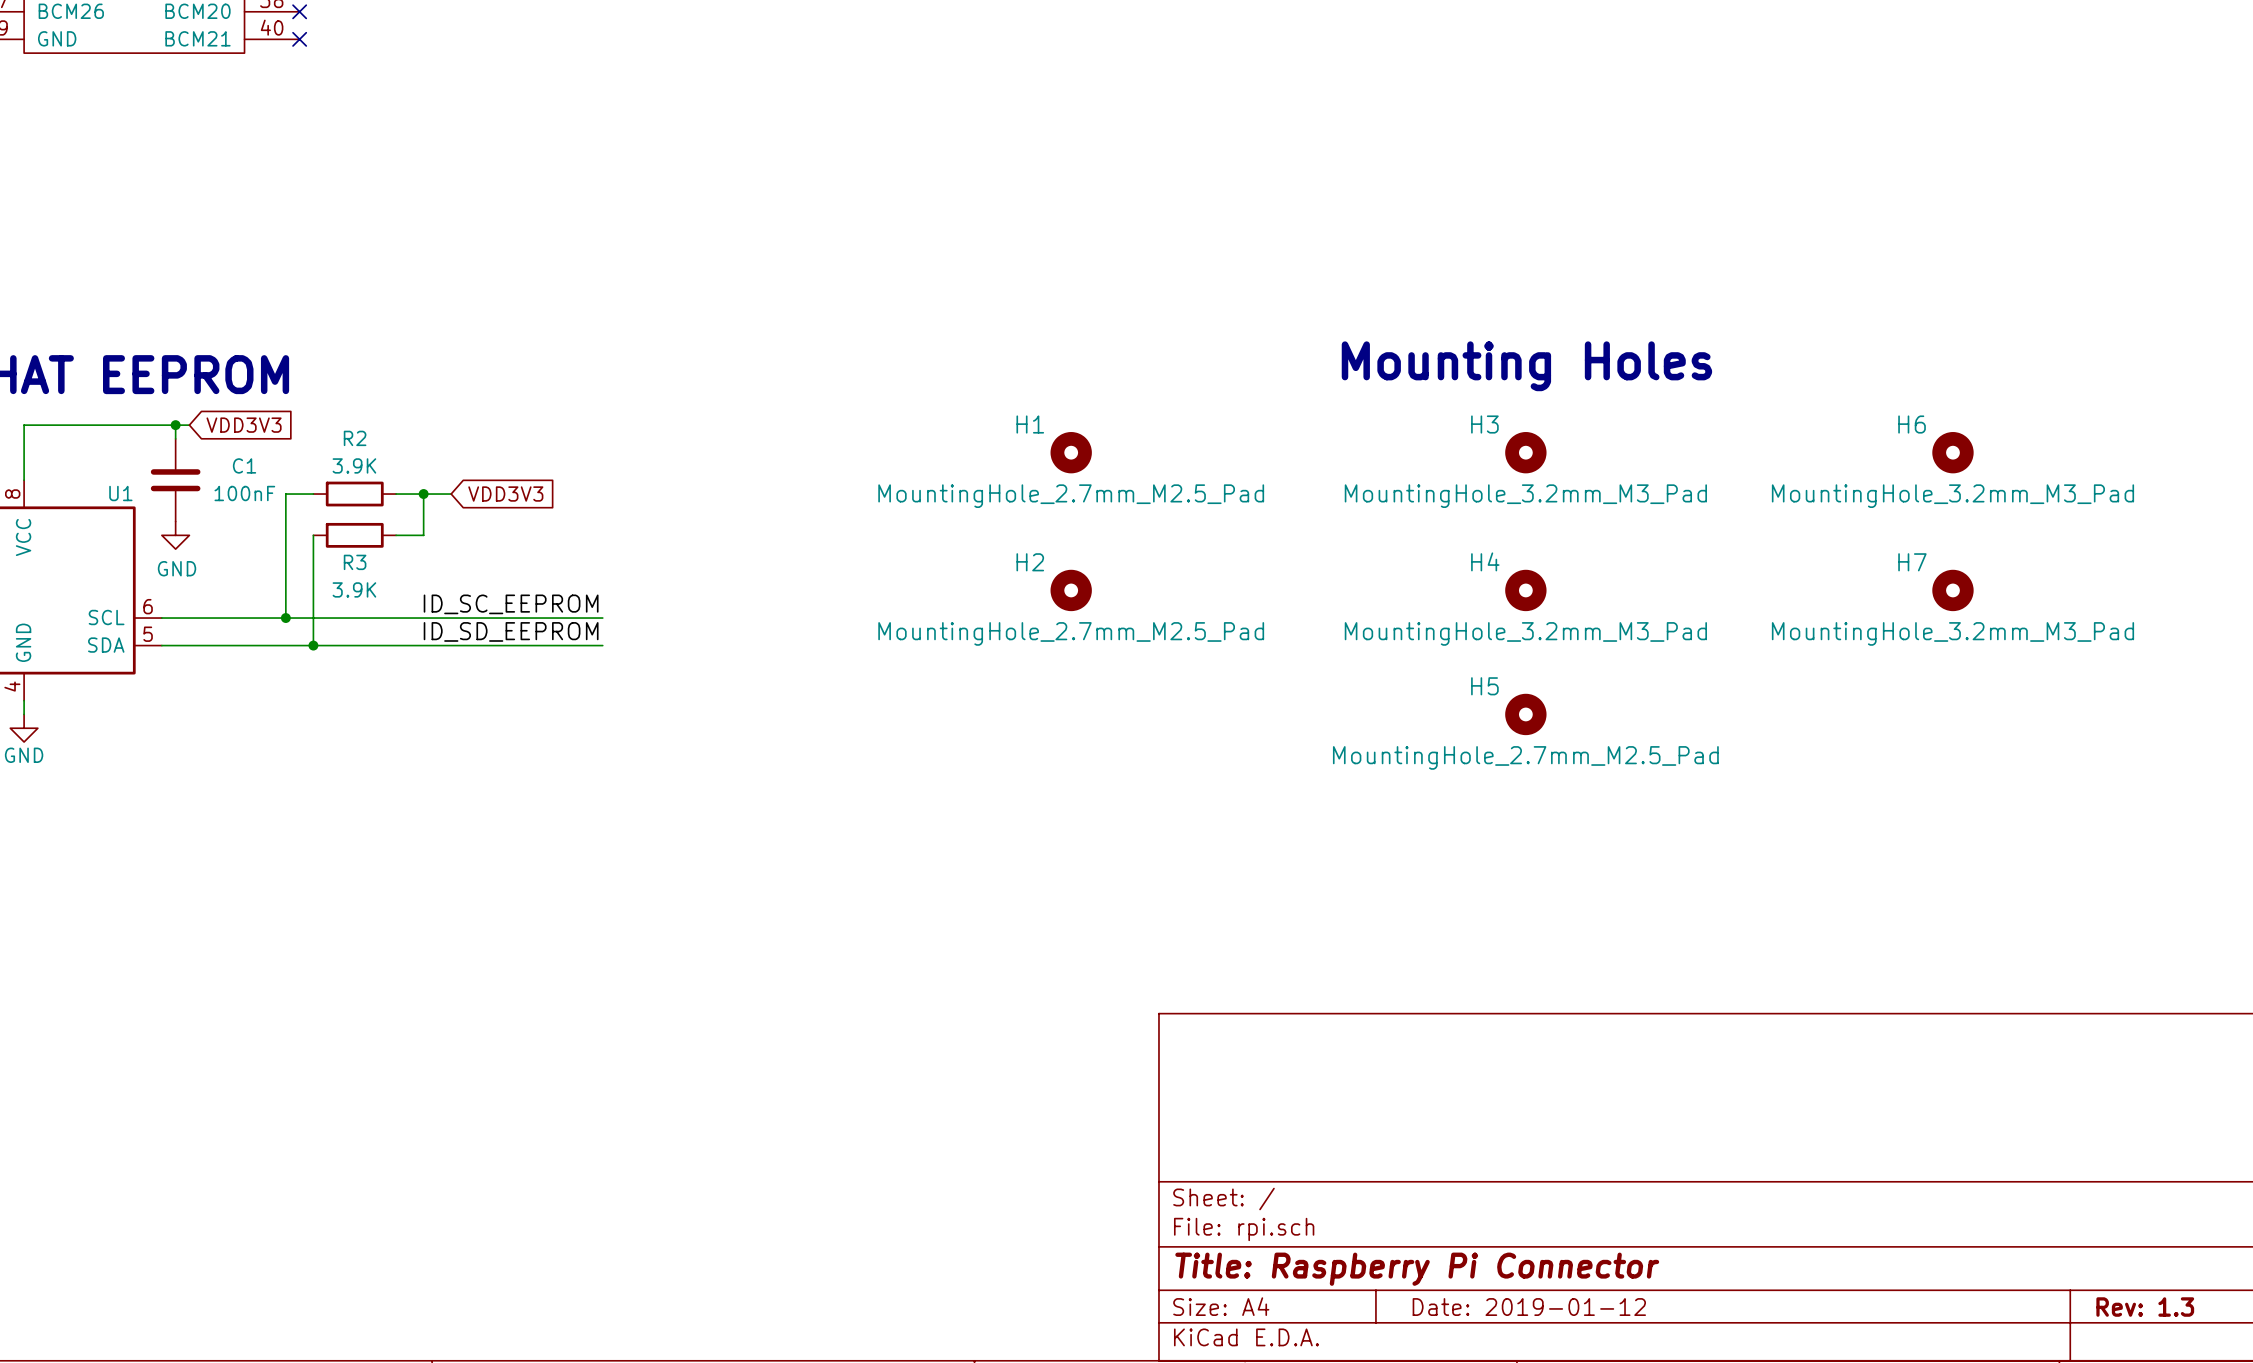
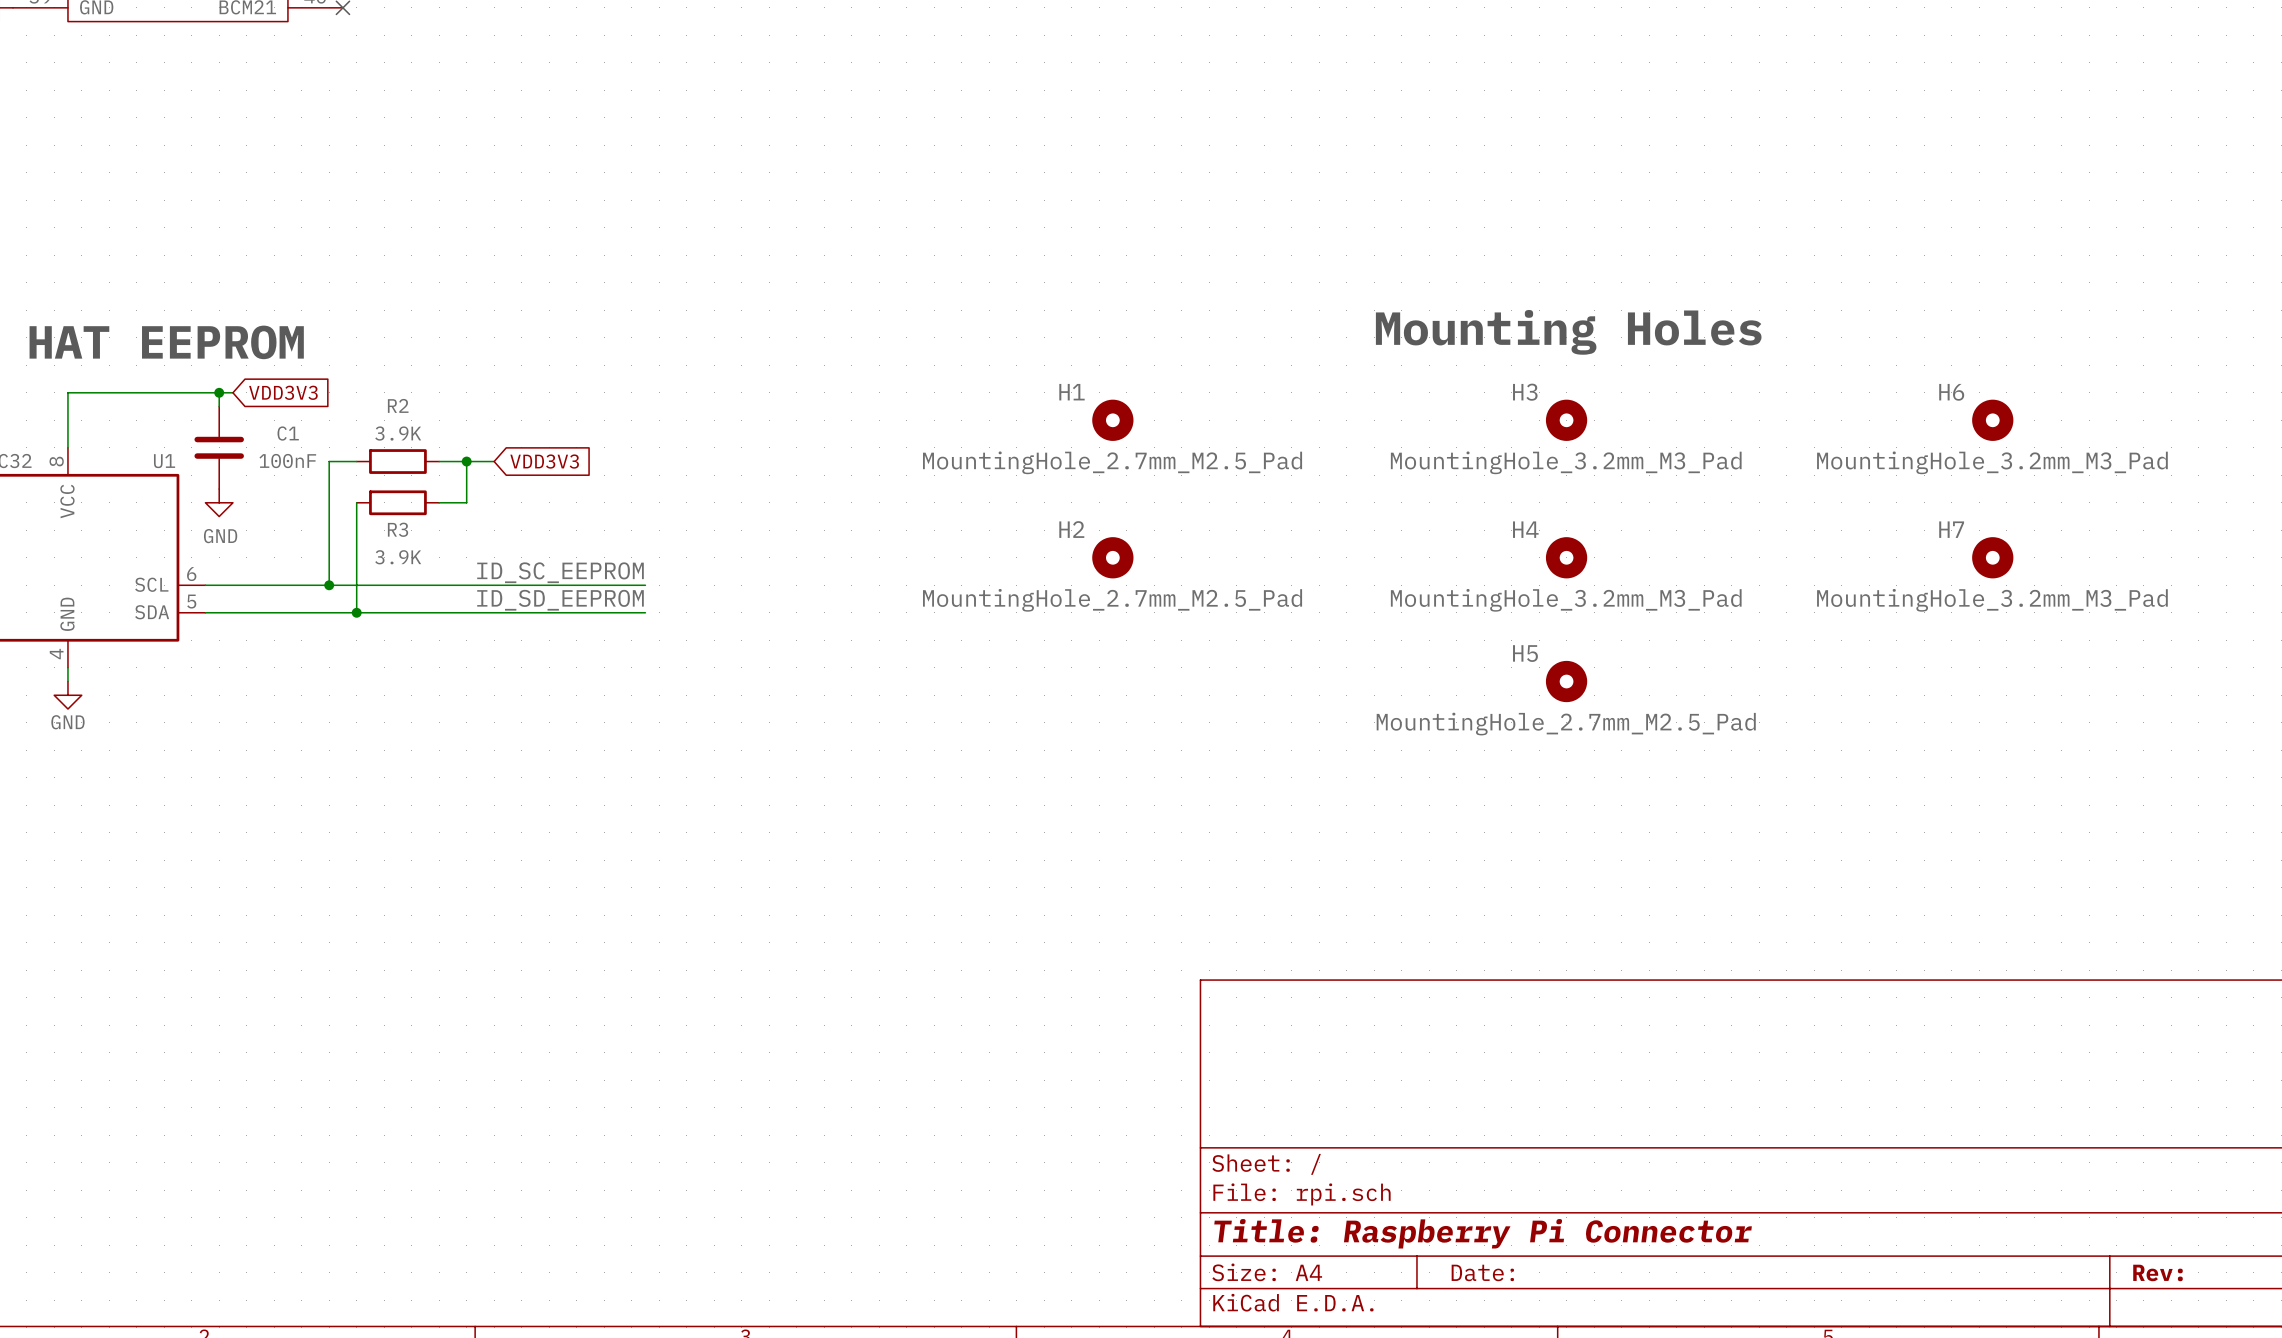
title block: Date: 2019-01-12 (1529, 1307) -> Date: (1482, 1272)
title block: Rev: 1.3 (2145, 1307) -> Rev: (2157, 1272)

